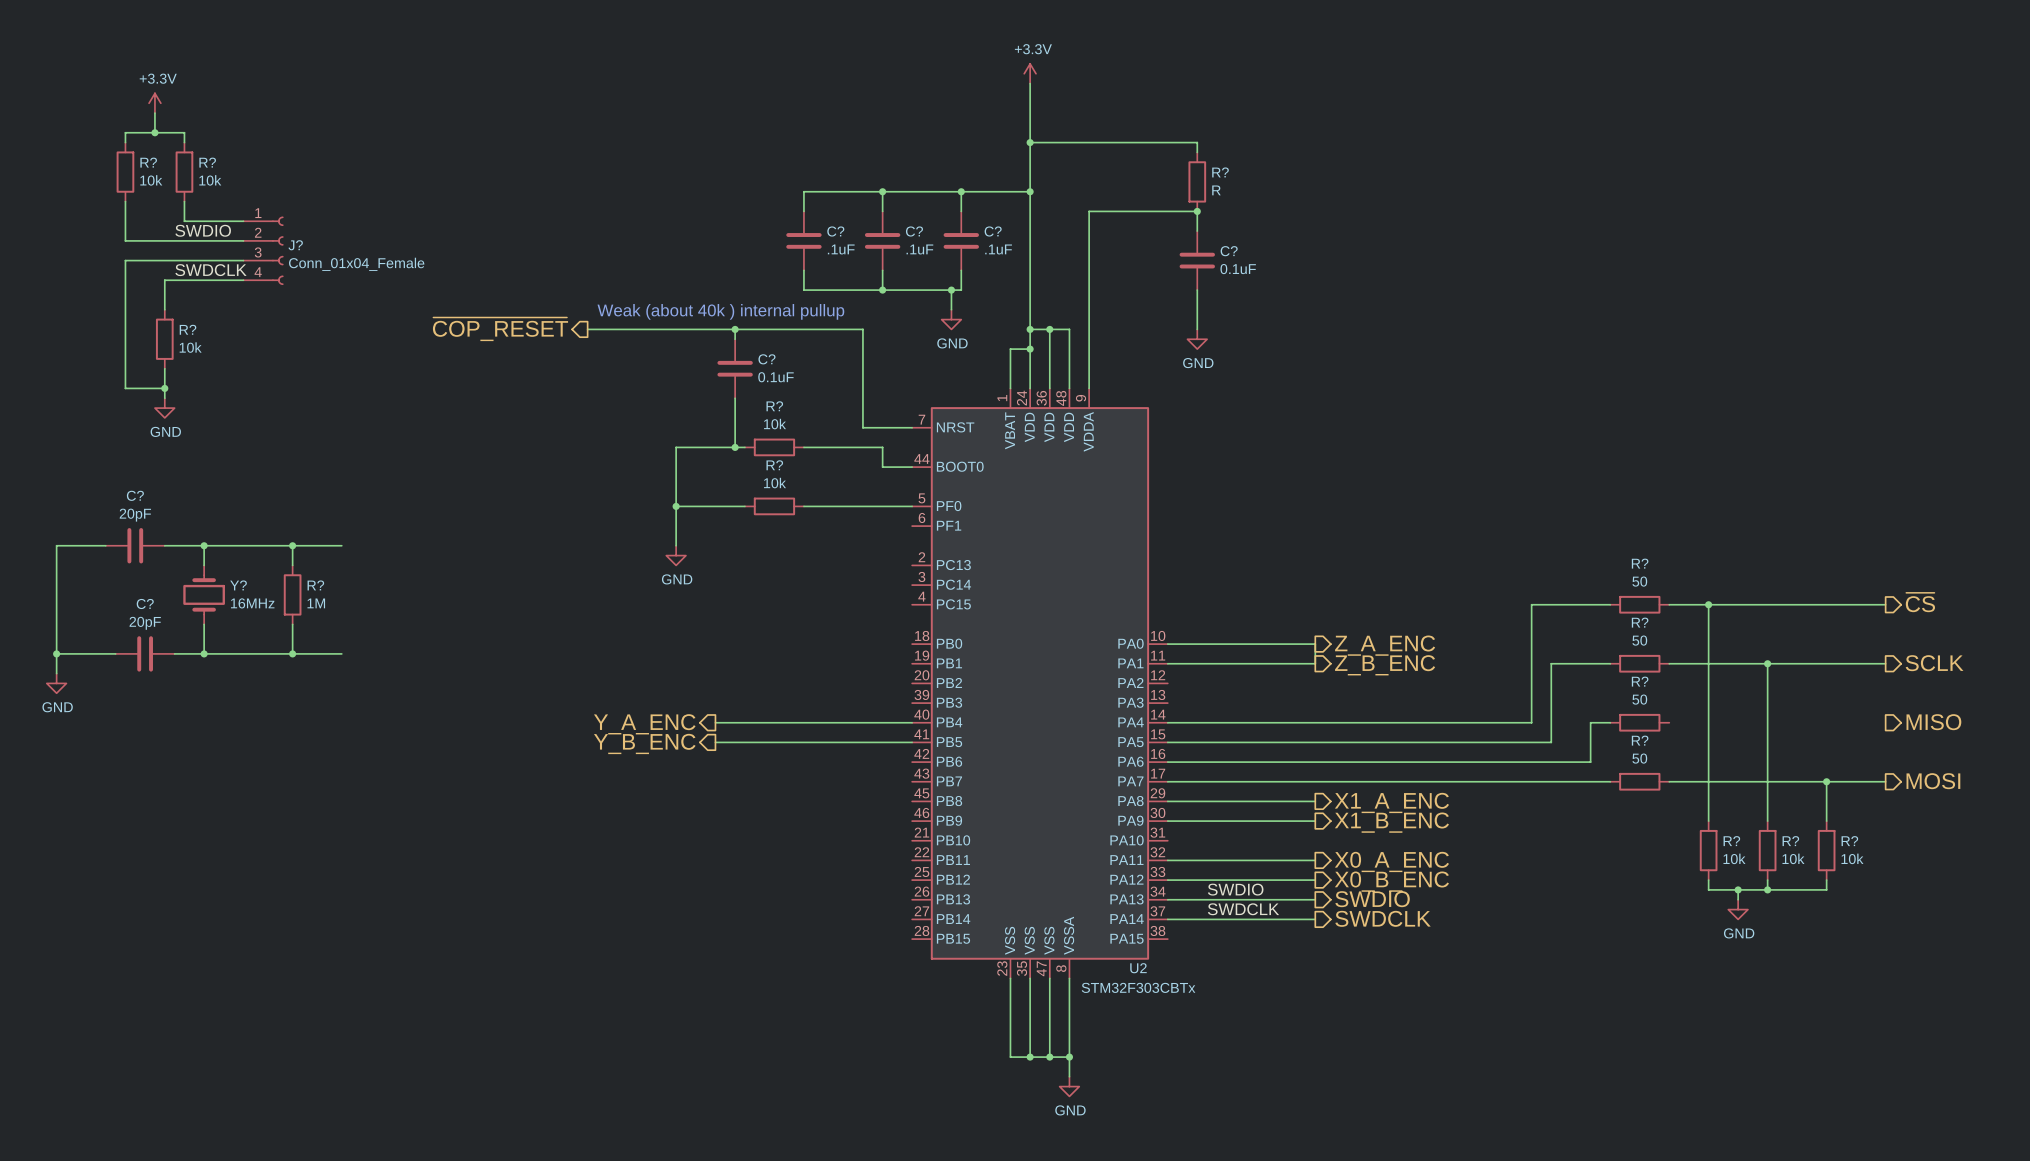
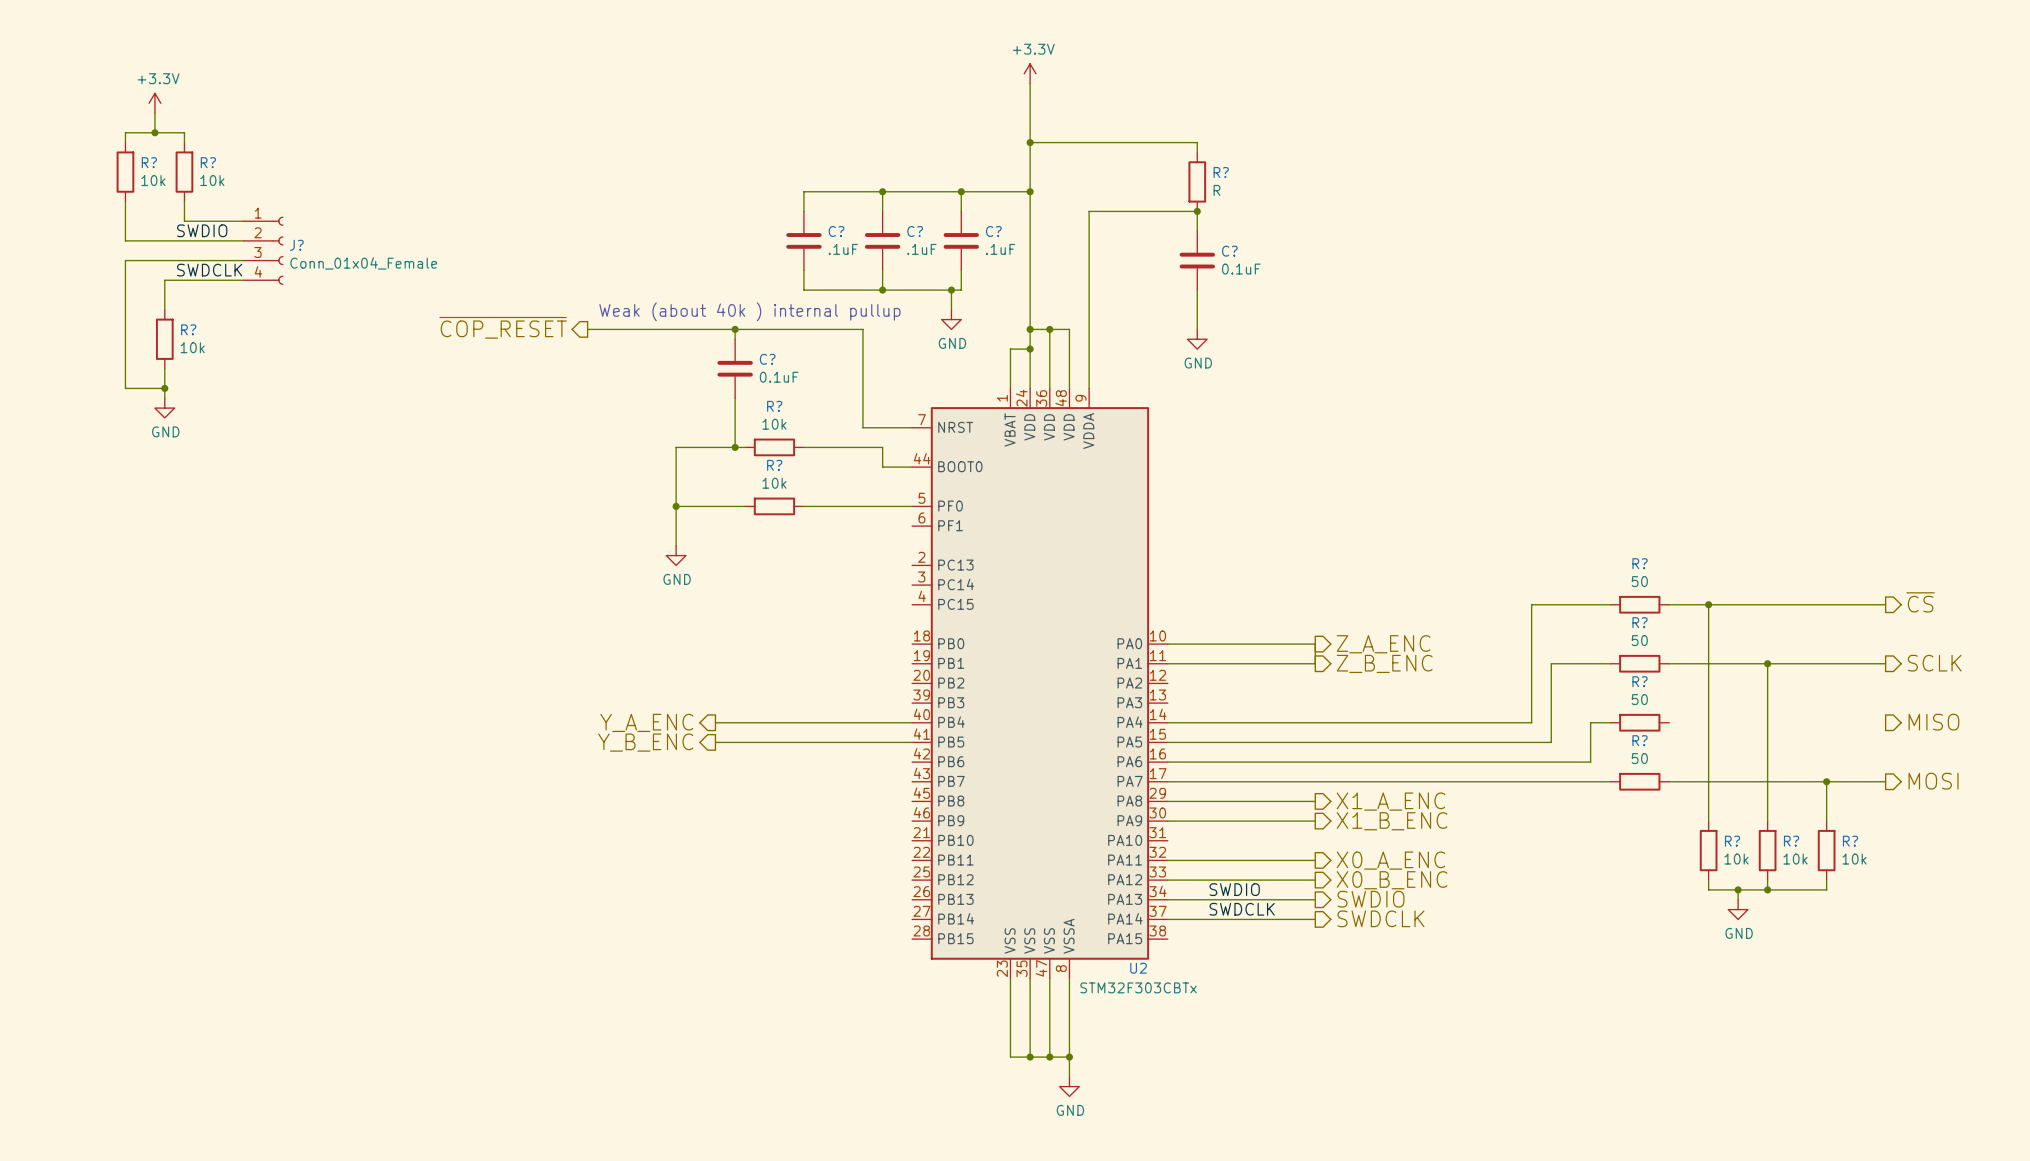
wire: (105, 545) (56, 545) (56, 673) -> none
C?: 20pF (135, 545) -> none
wire: (164, 545) (341, 545) -> none
wire: (204, 545) (204, 565) -> none
junction: (204, 545) -> none
wire: (292, 545) (292, 565) -> none
junction: (292, 545) -> none
Y?: 16MHz (204, 594) -> none
R?: 1M (292, 594) -> none
wire: (204, 624) (204, 653) -> none
wire: (292, 624) (292, 653) -> none
wire: (56, 653) (115, 653) -> none
junction: (56, 653) -> none
C?: 20pF (145, 653) -> none
wire: (174, 653) (341, 653) -> none
junction: (204, 653) -> none
junction: (292, 653) -> none
power symbol: GND (56, 683) -> none

